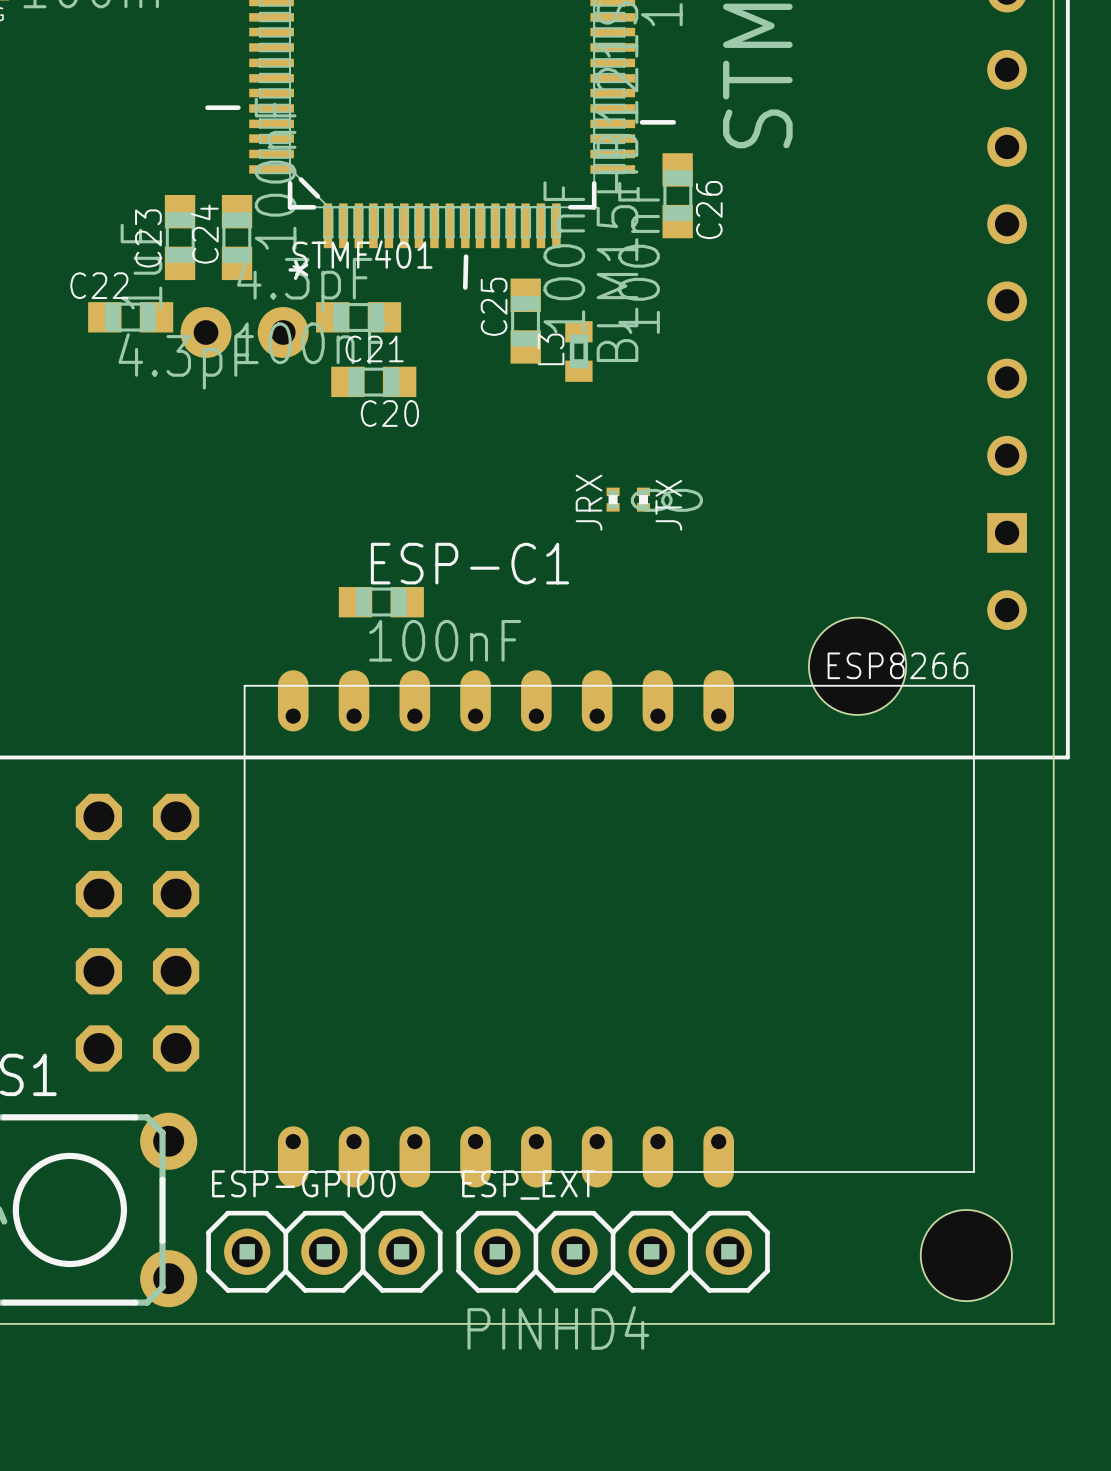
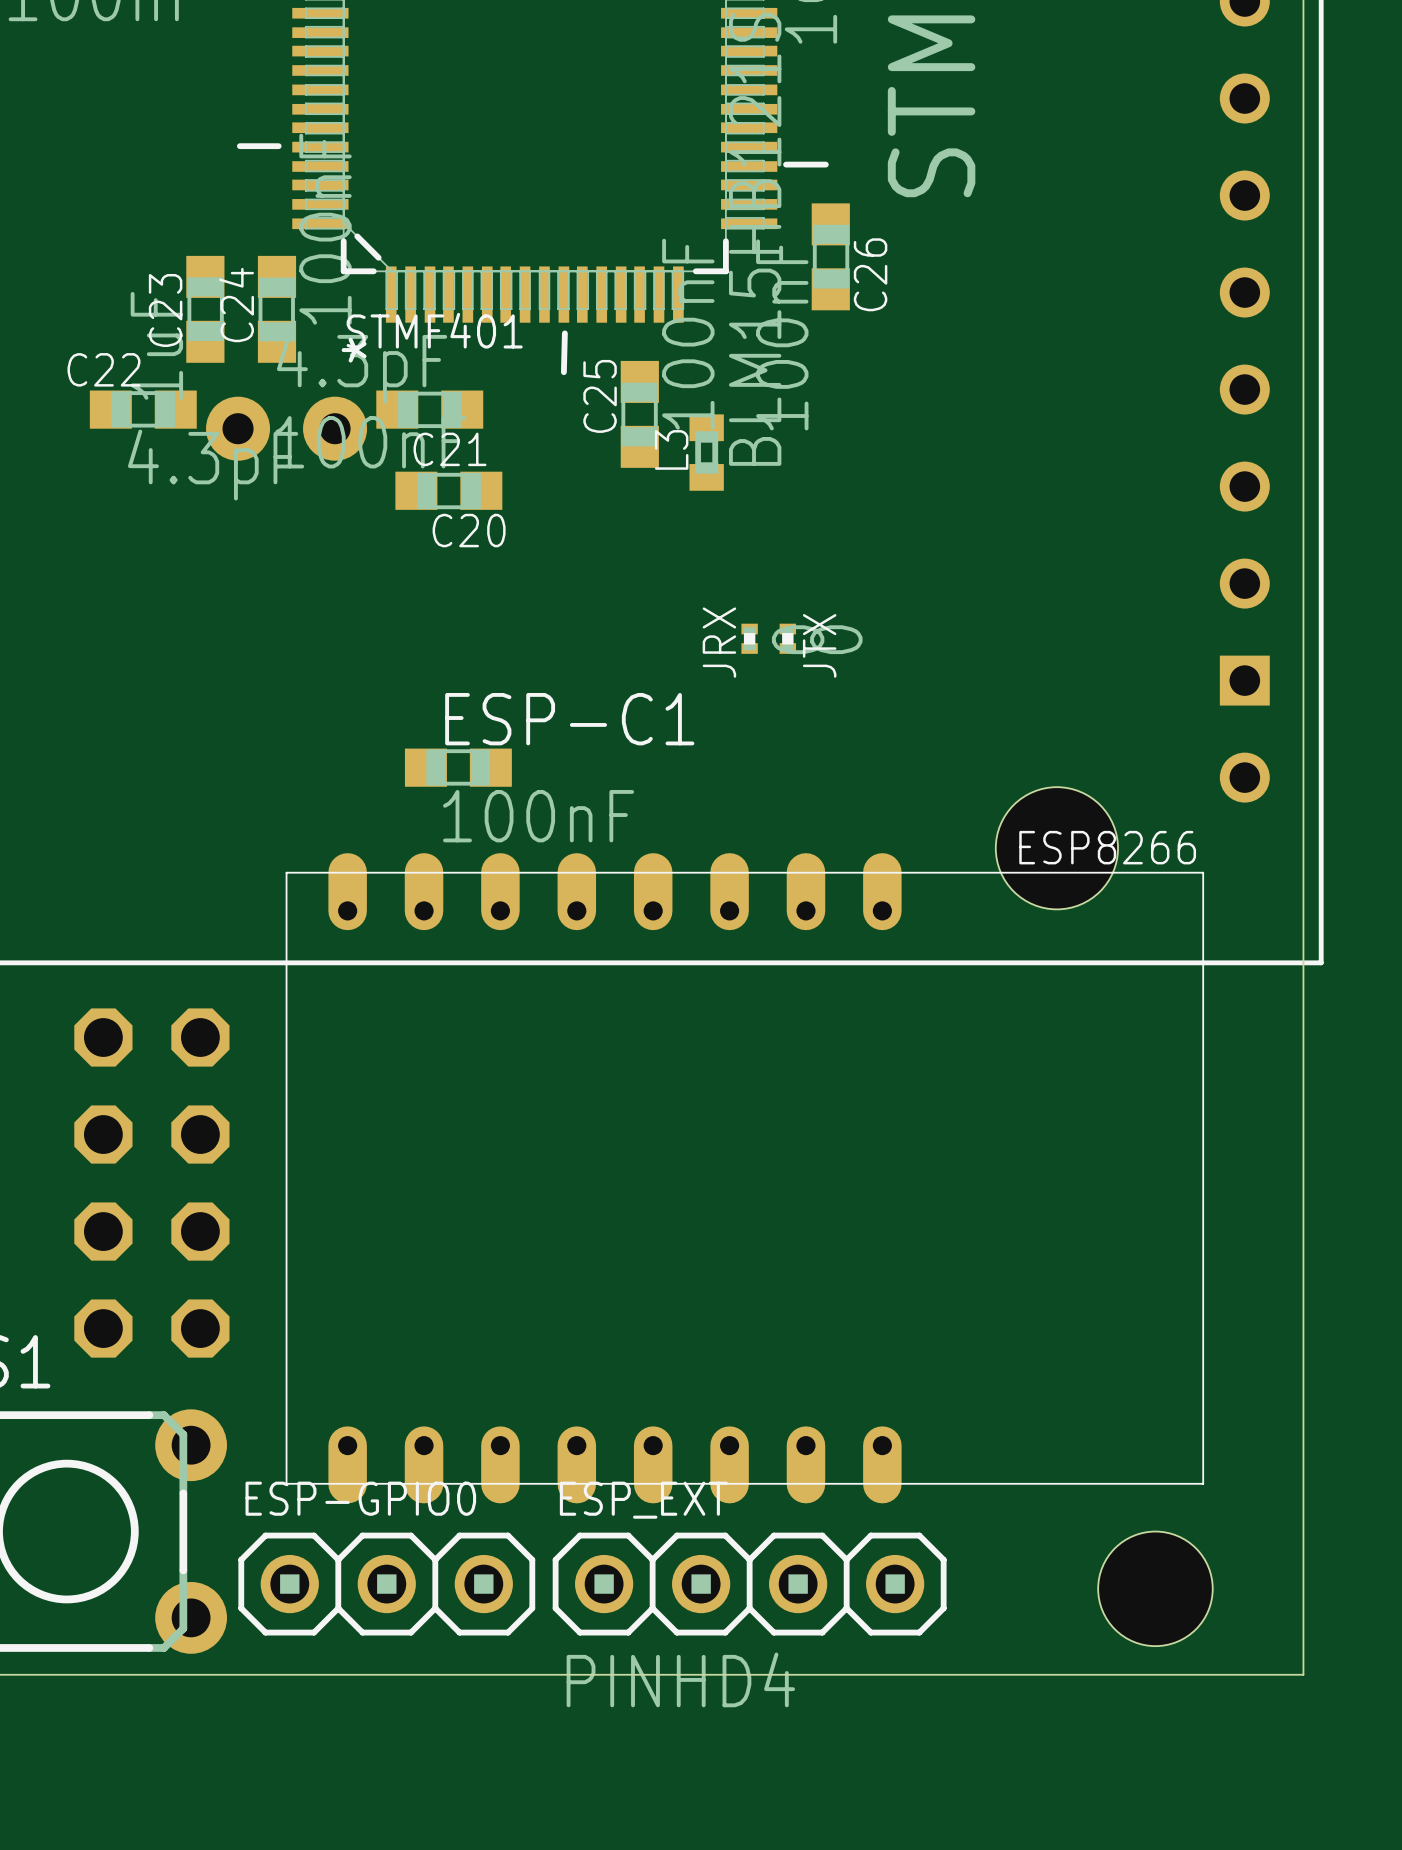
hole position: (966, 1255) -> (1155, 1588)

